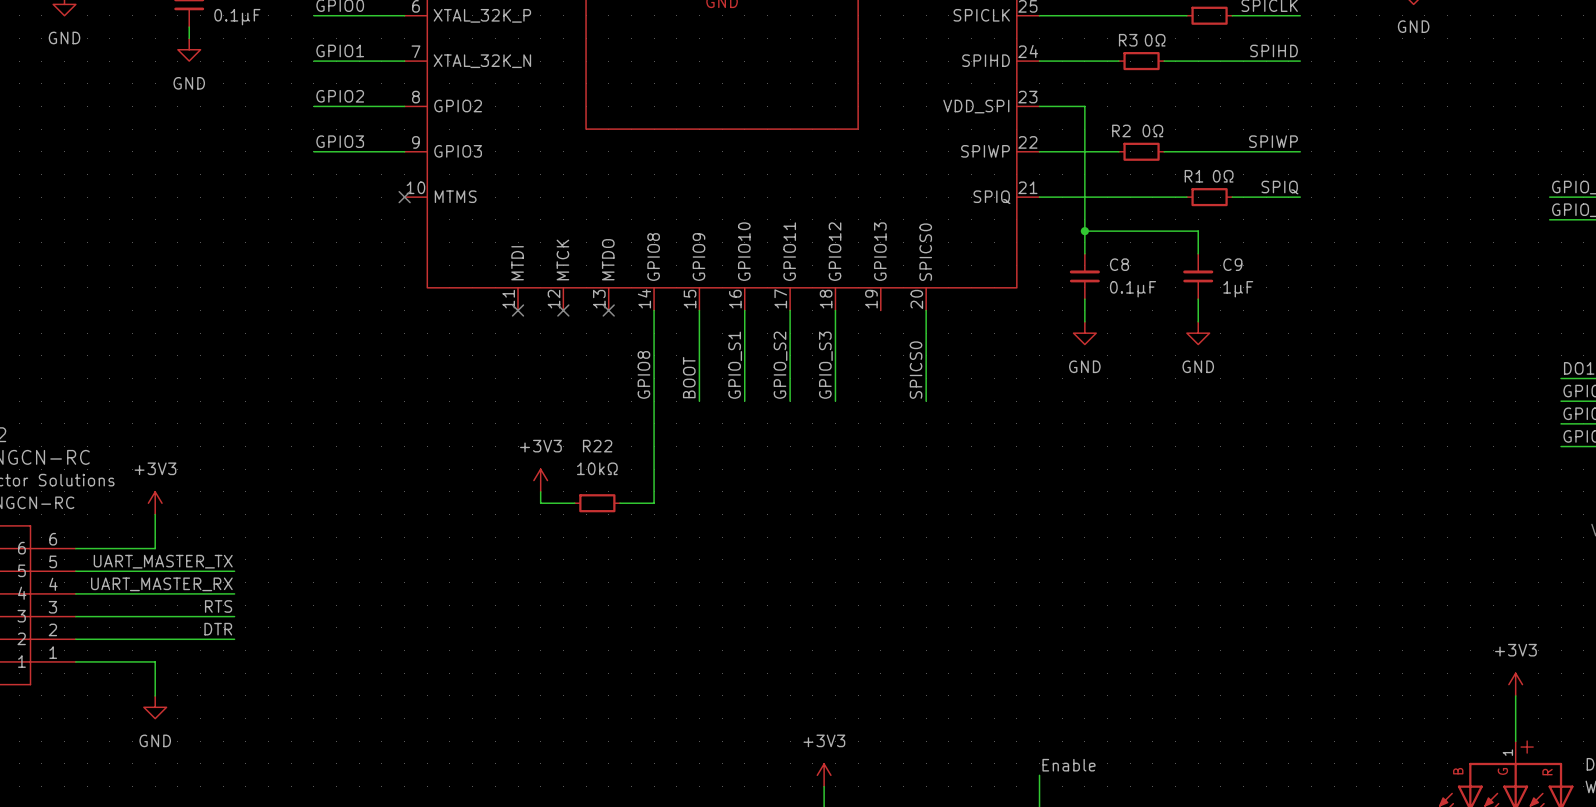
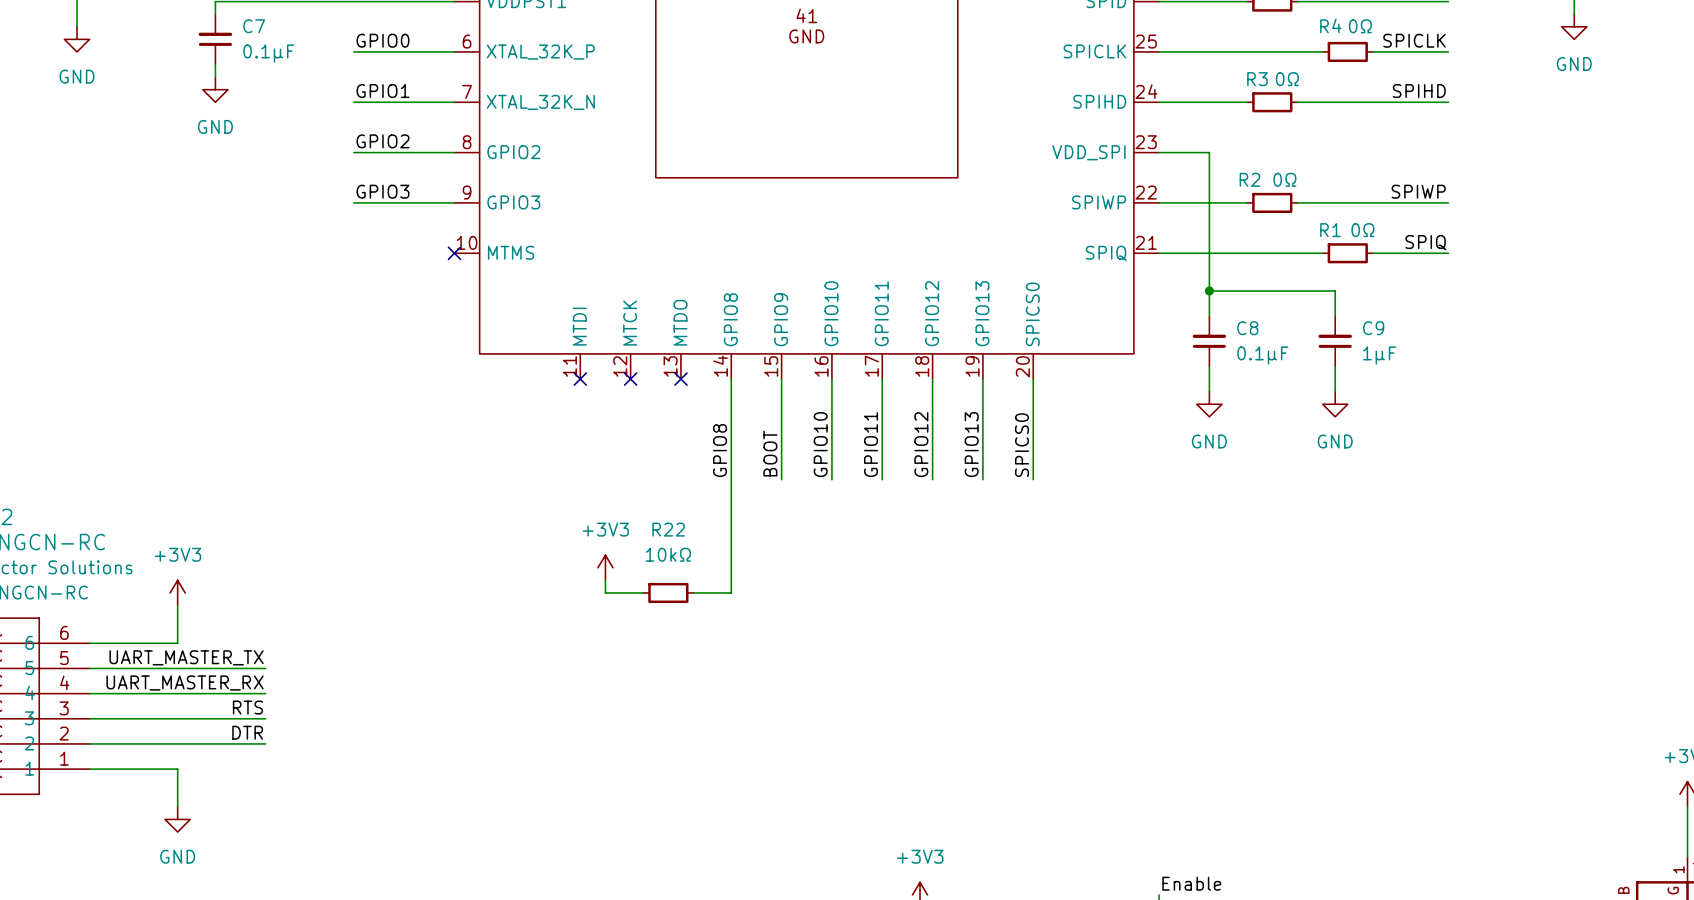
wire: none -> (982, 379) (982, 479)
label: GPIO_S1 (735, 365) -> GPIO10 (820, 444)
label: GPIO_S2 (780, 365) -> GPIO11 (871, 444)
label: GPIO_S3 (825, 365) -> GPIO12 (921, 444)
label: none -> GPIO13 (971, 444)

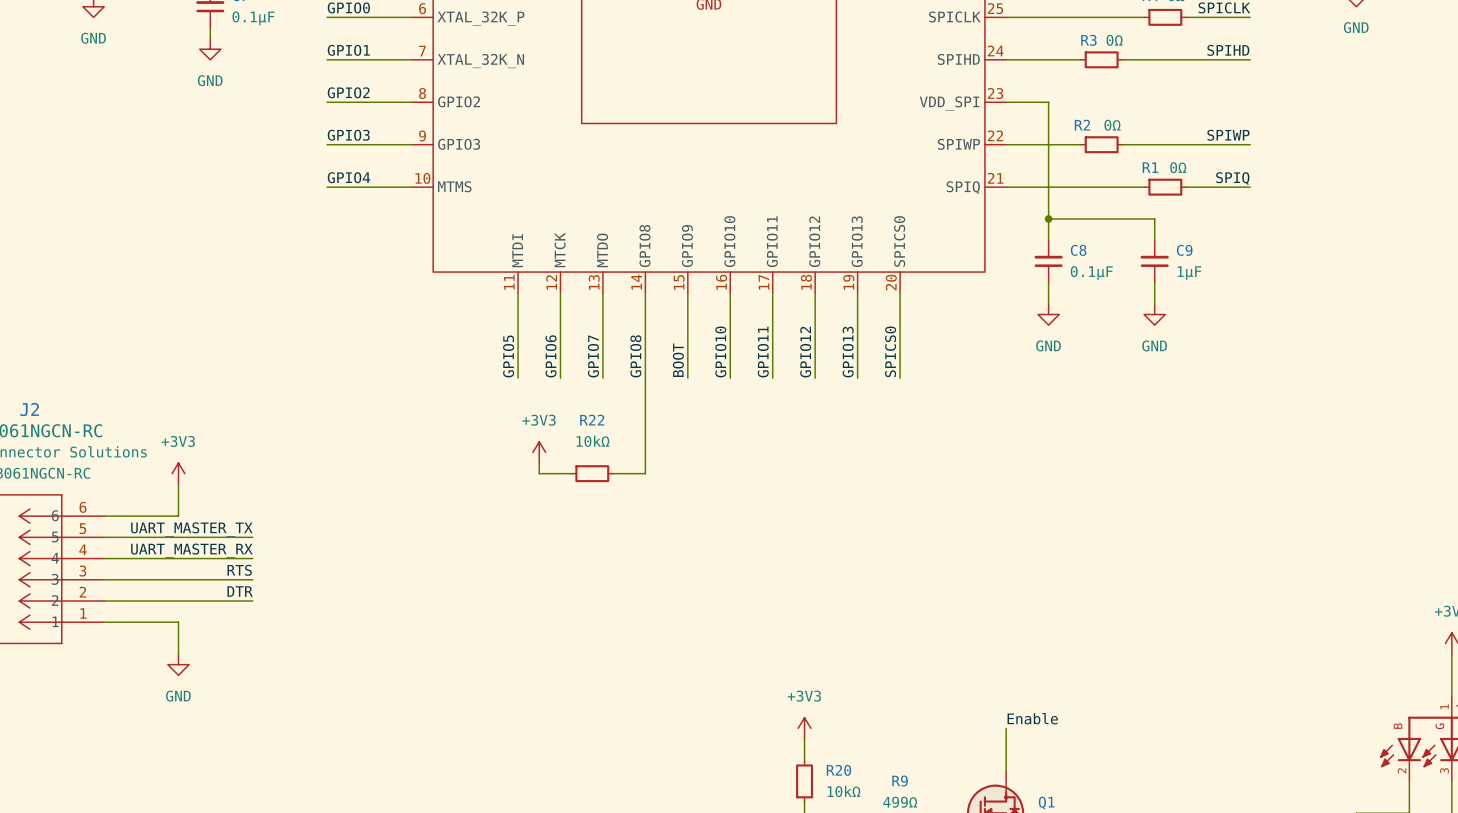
label: none -> GPIO4 (348, 177)
wire: none -> (327, 187) (411, 187)
no-connect mark: (454, 253) -> none
wire: none -> (518, 293) (518, 378)
no-connect mark: (580, 379) -> none
wire: none -> (560, 293) (560, 378)
no-connect mark: (630, 379) -> none
wire: none -> (602, 293) (602, 378)
no-connect mark: (680, 379) -> none
label: none -> GPIO5 (508, 356)
label: none -> GPIO6 (551, 356)
label: none -> GPIO7 (593, 356)

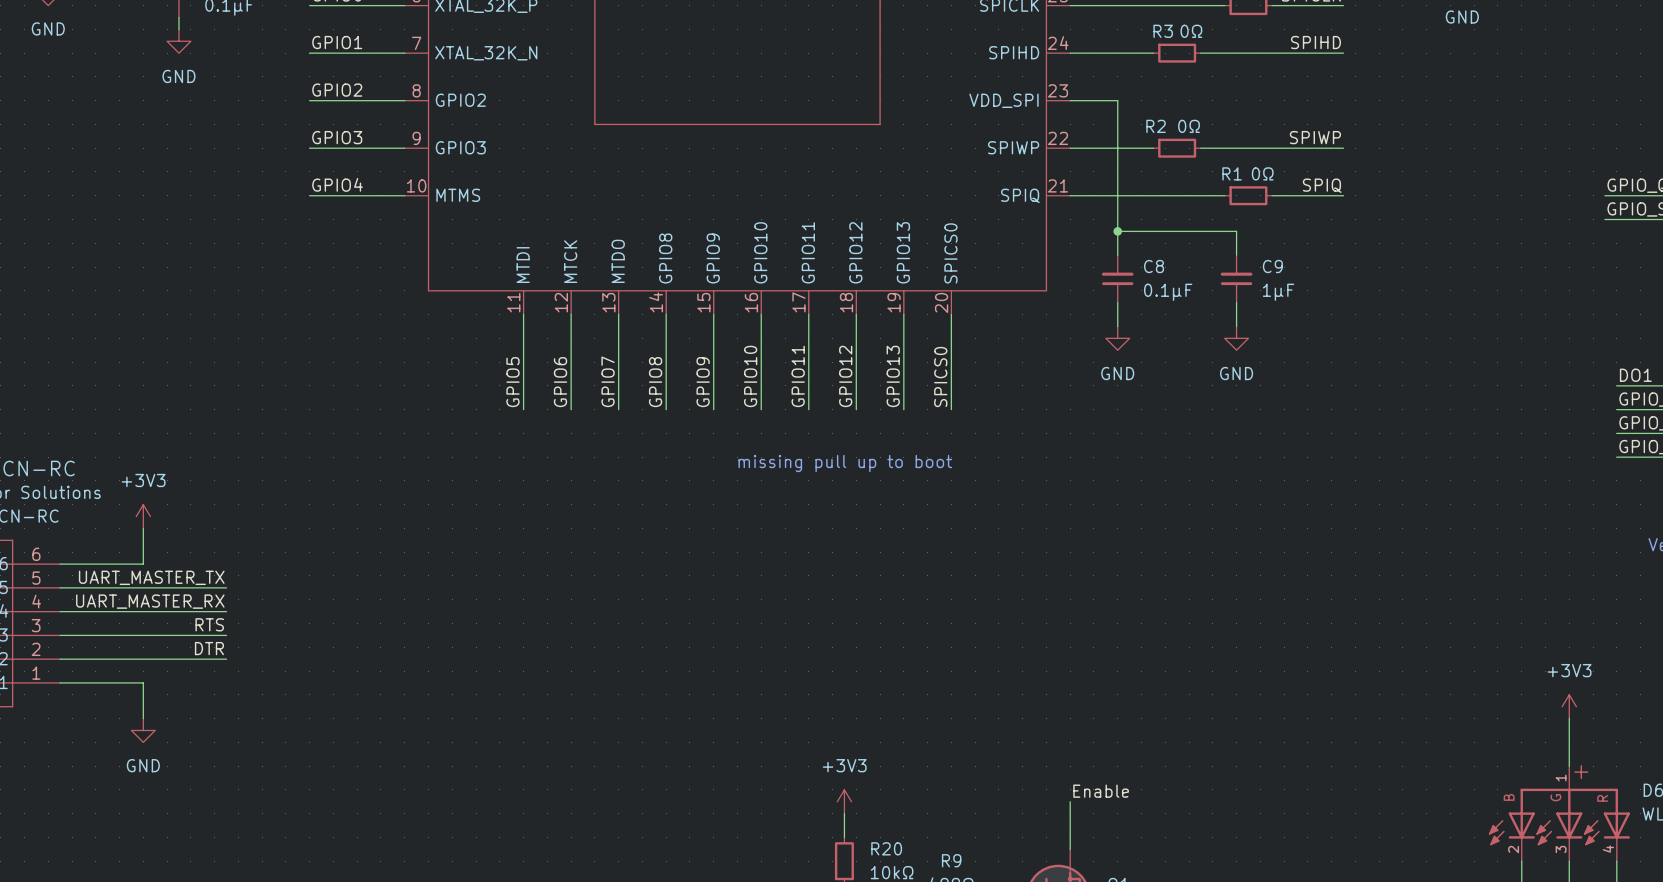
label: BOOT (678, 360) -> GPIO9 (703, 382)
wire: (645, 378) (645, 473) (613, 473) -> none
text: none -> missing pull up to boot (845, 463)
power symbol: +3V3 (539, 452) -> none
wire: (539, 463) (539, 473) (571, 473) -> none
R22: (592, 473) -> none

